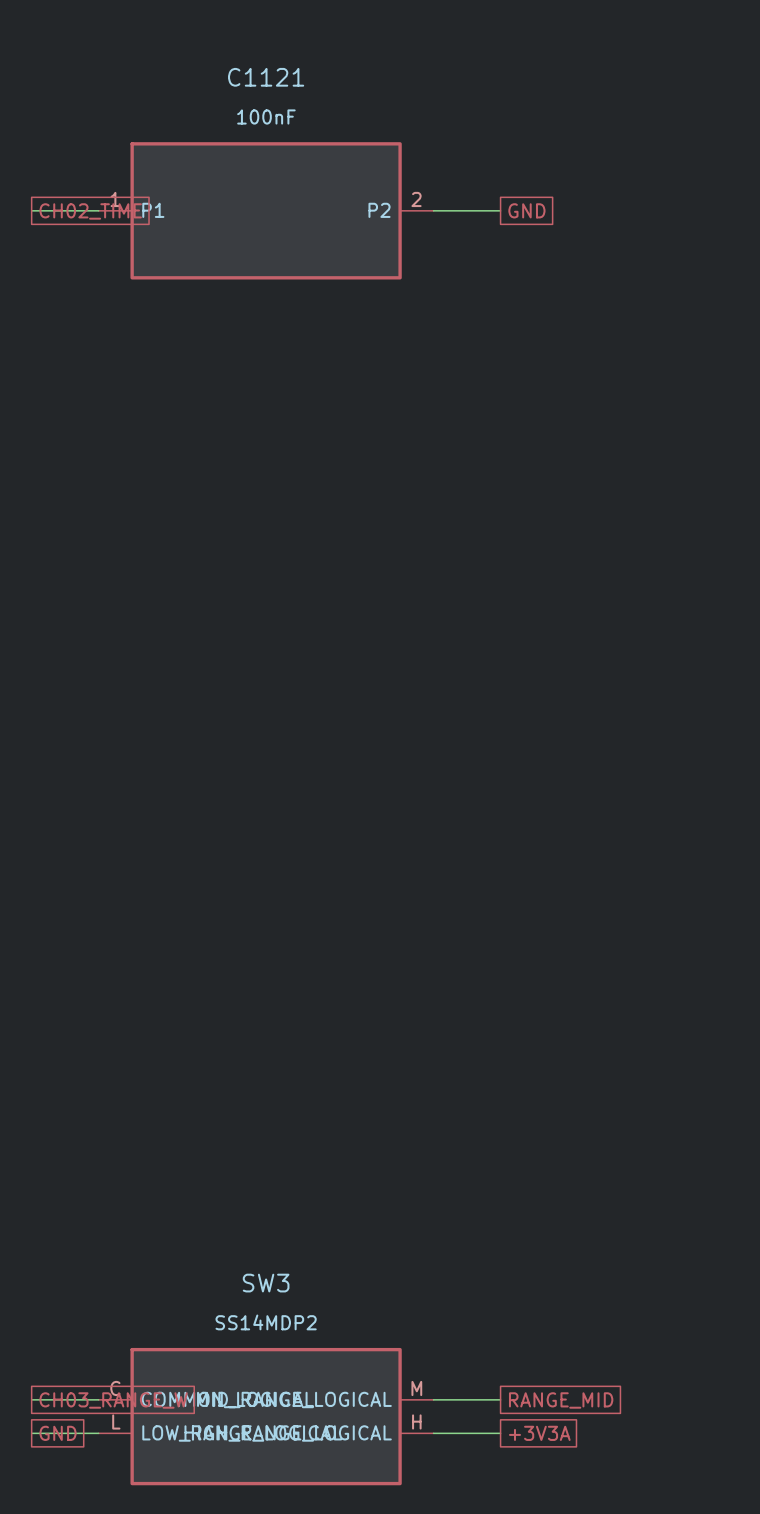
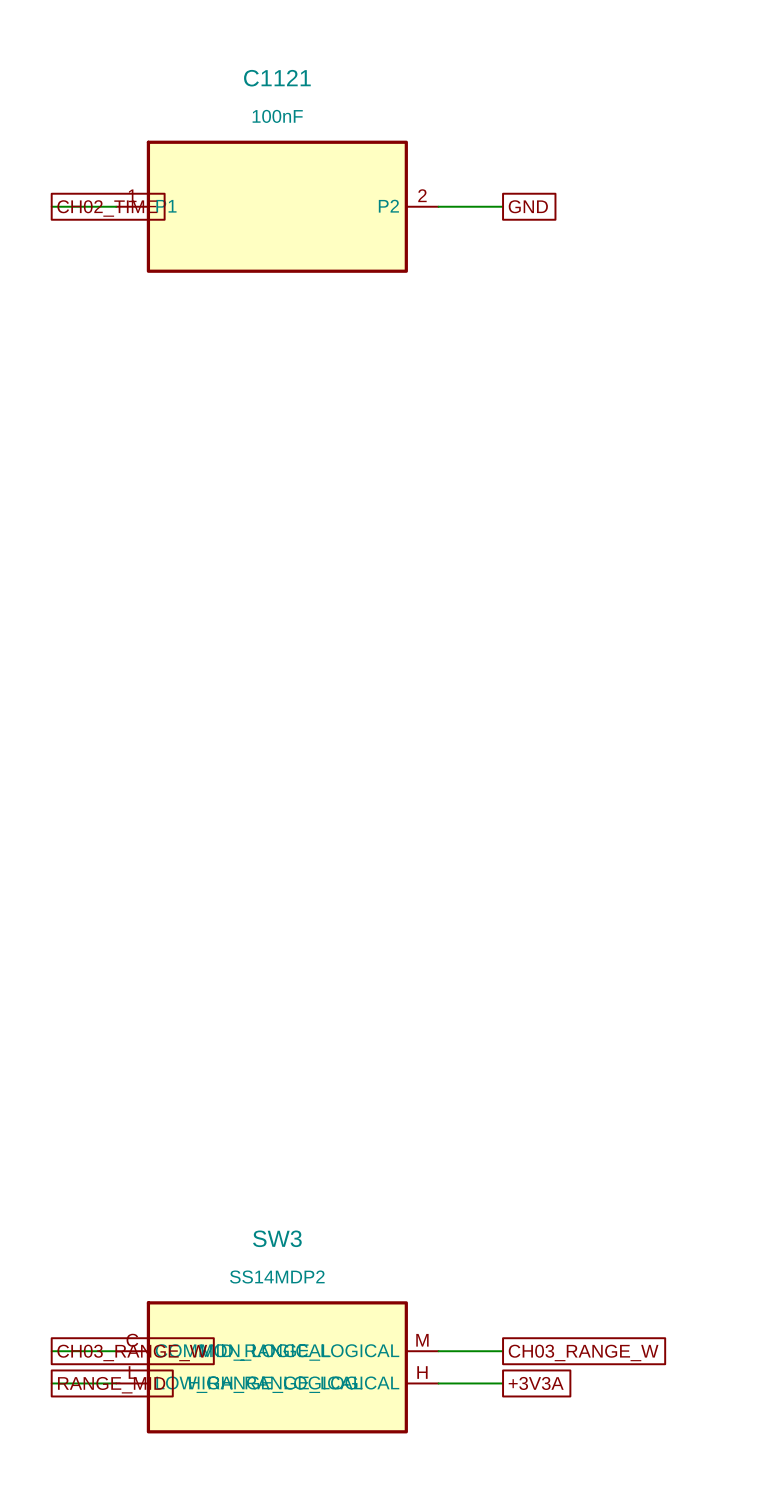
global label: RANGE_MID (561, 1400) -> CH03_RANGE_W (583, 1352)
global label: GND (58, 1433) -> RANGE_MID (111, 1385)

